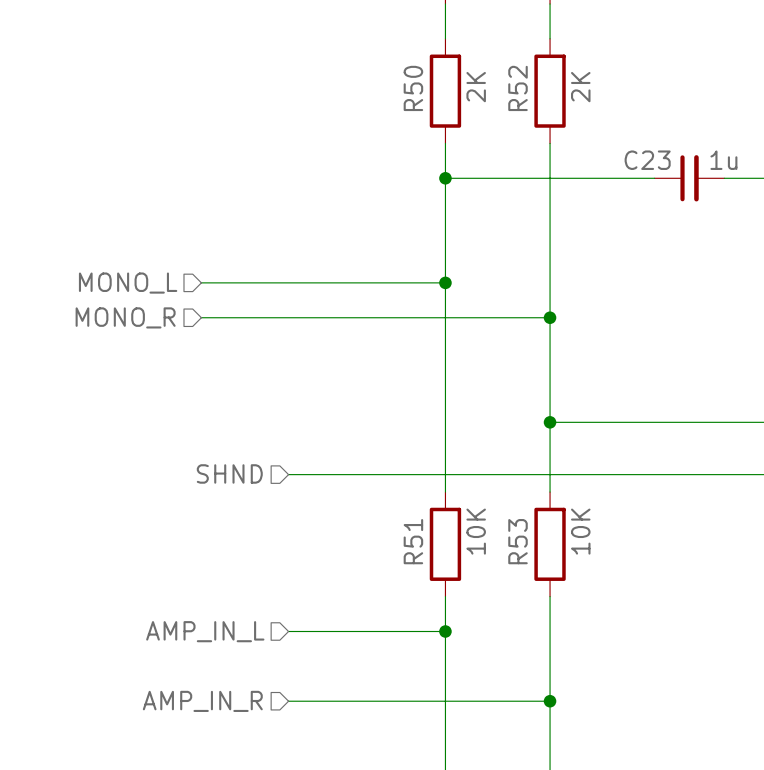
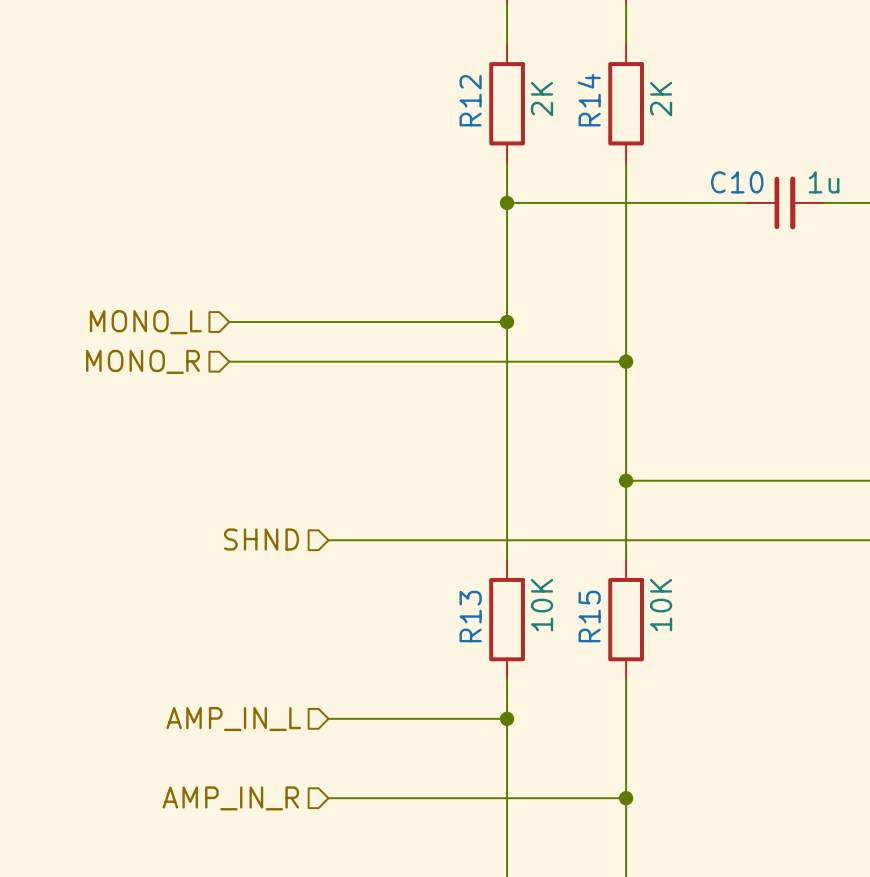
R50 name: R50 (413, 88) -> R12 (470, 100)
R52 name: R52 (518, 88) -> R14 (589, 100)
C23 name: C23 (647, 160) -> C10 (737, 182)
R51 name: R51 (413, 541) -> R13 (470, 616)
R53 name: R53 (518, 541) -> R15 (589, 616)

